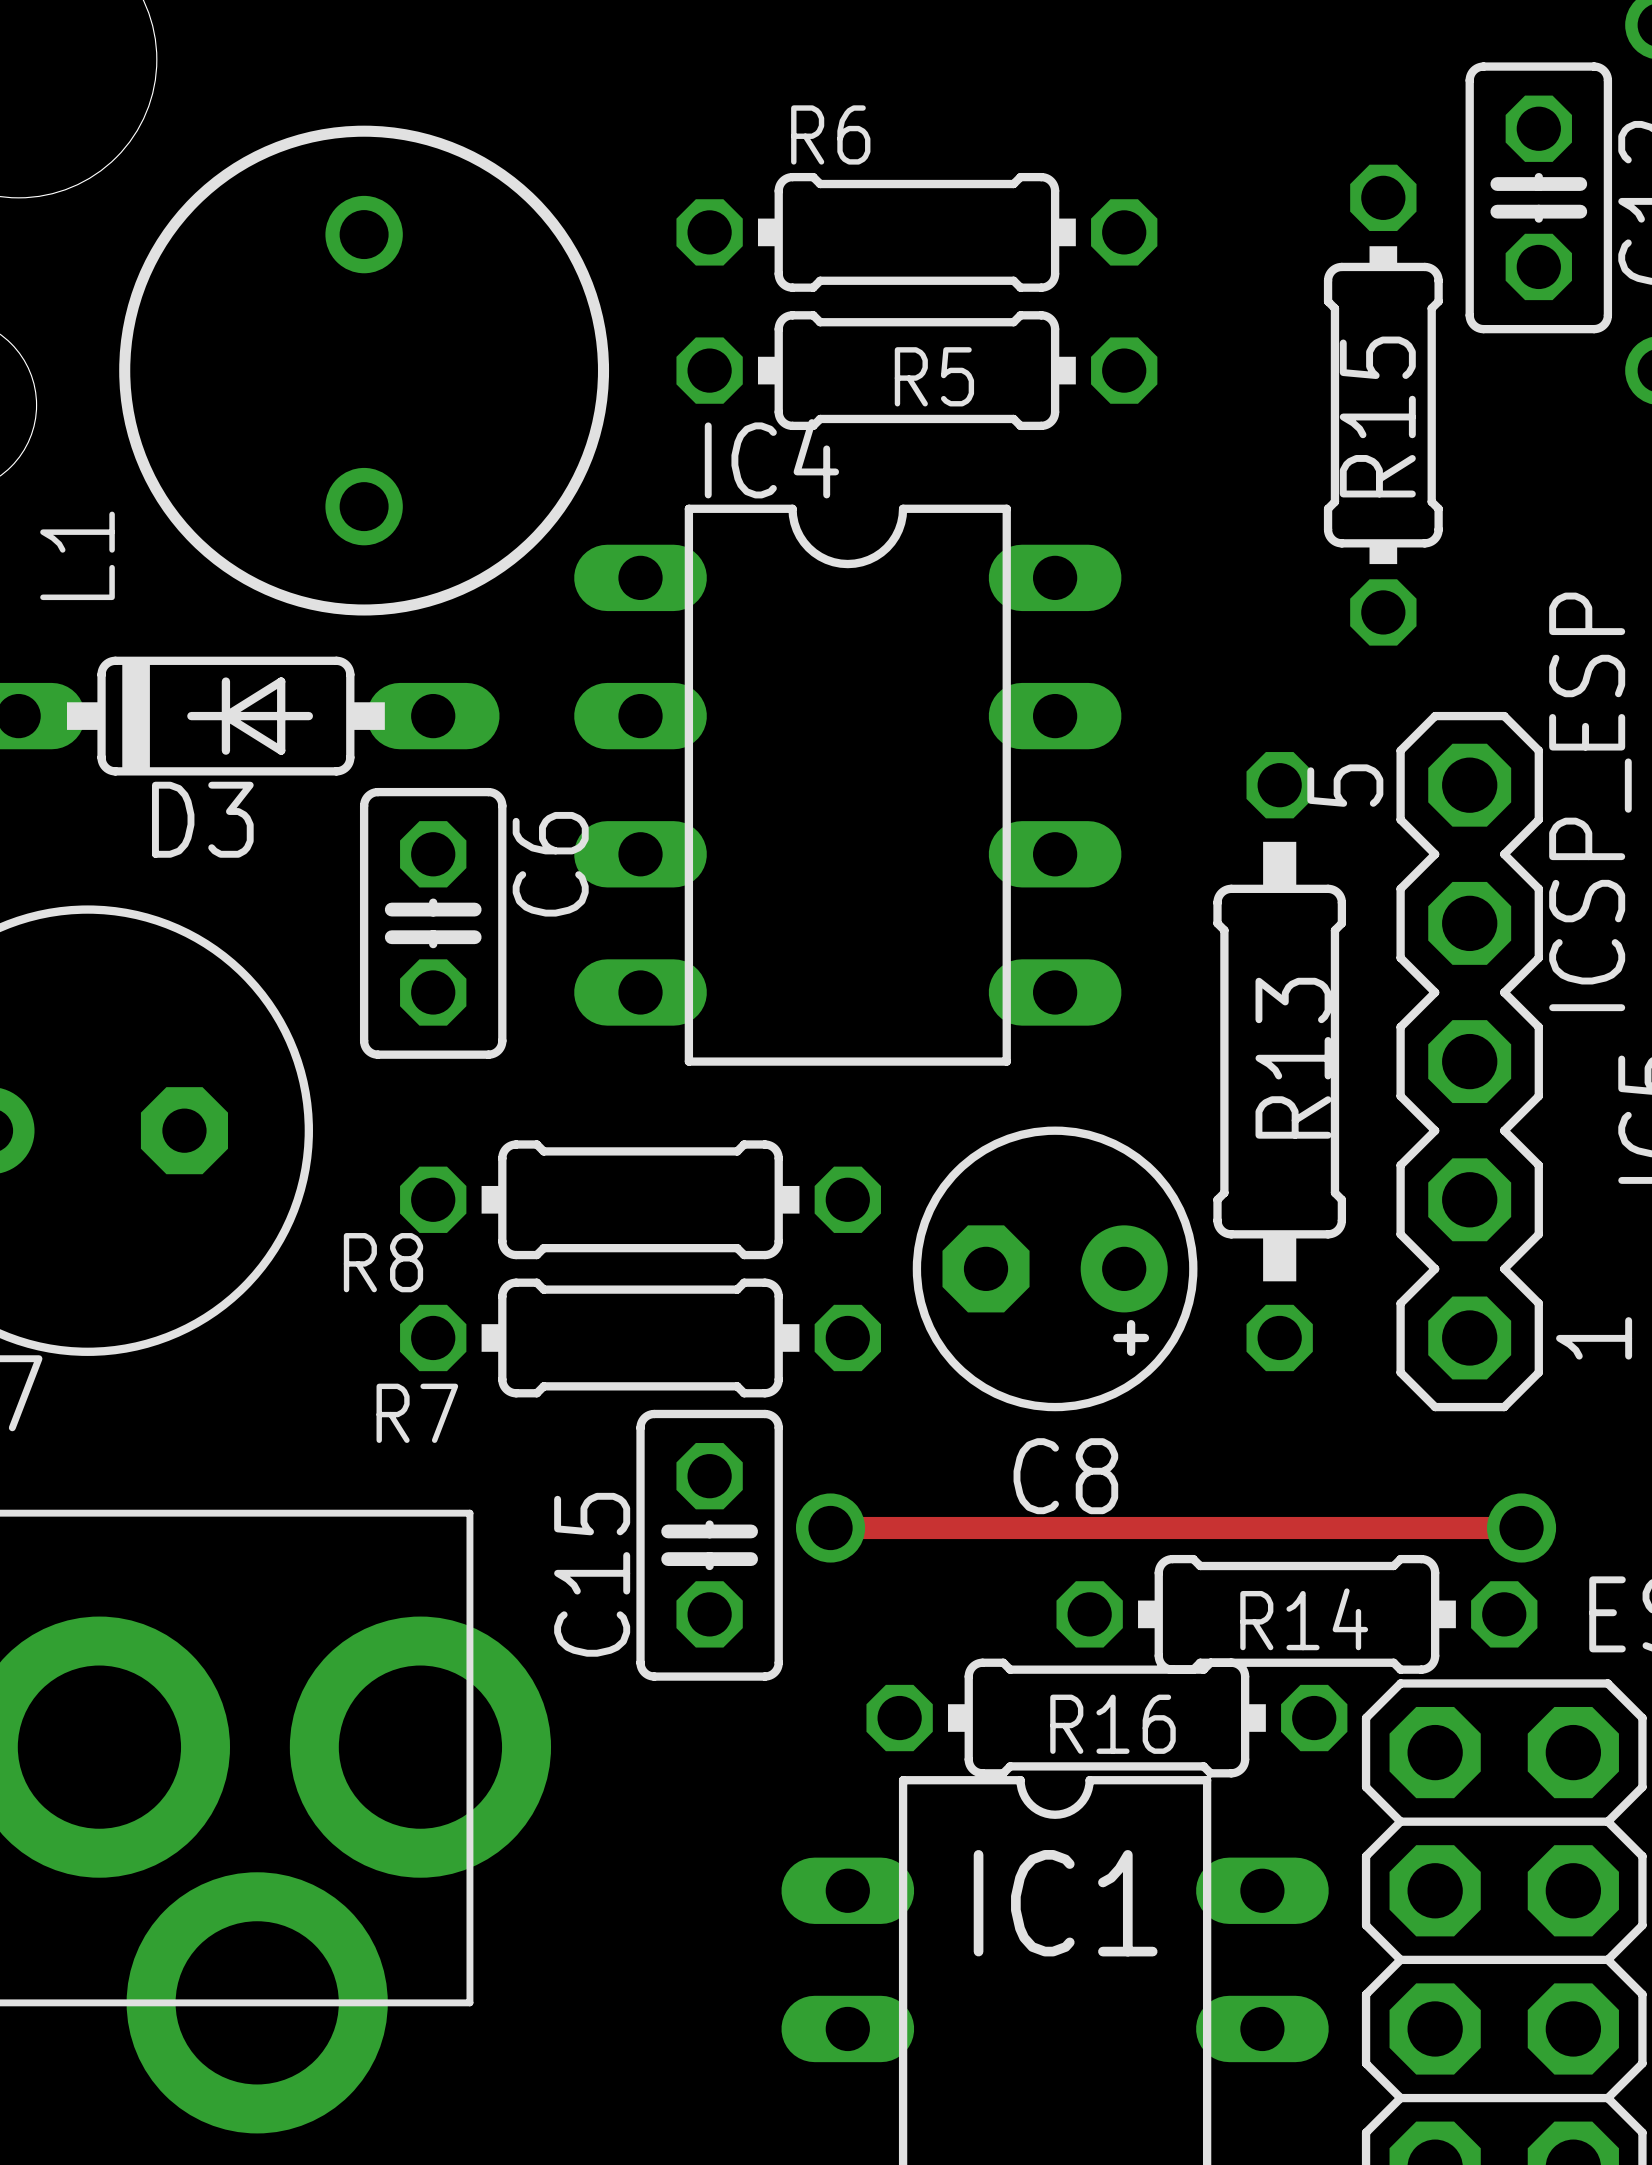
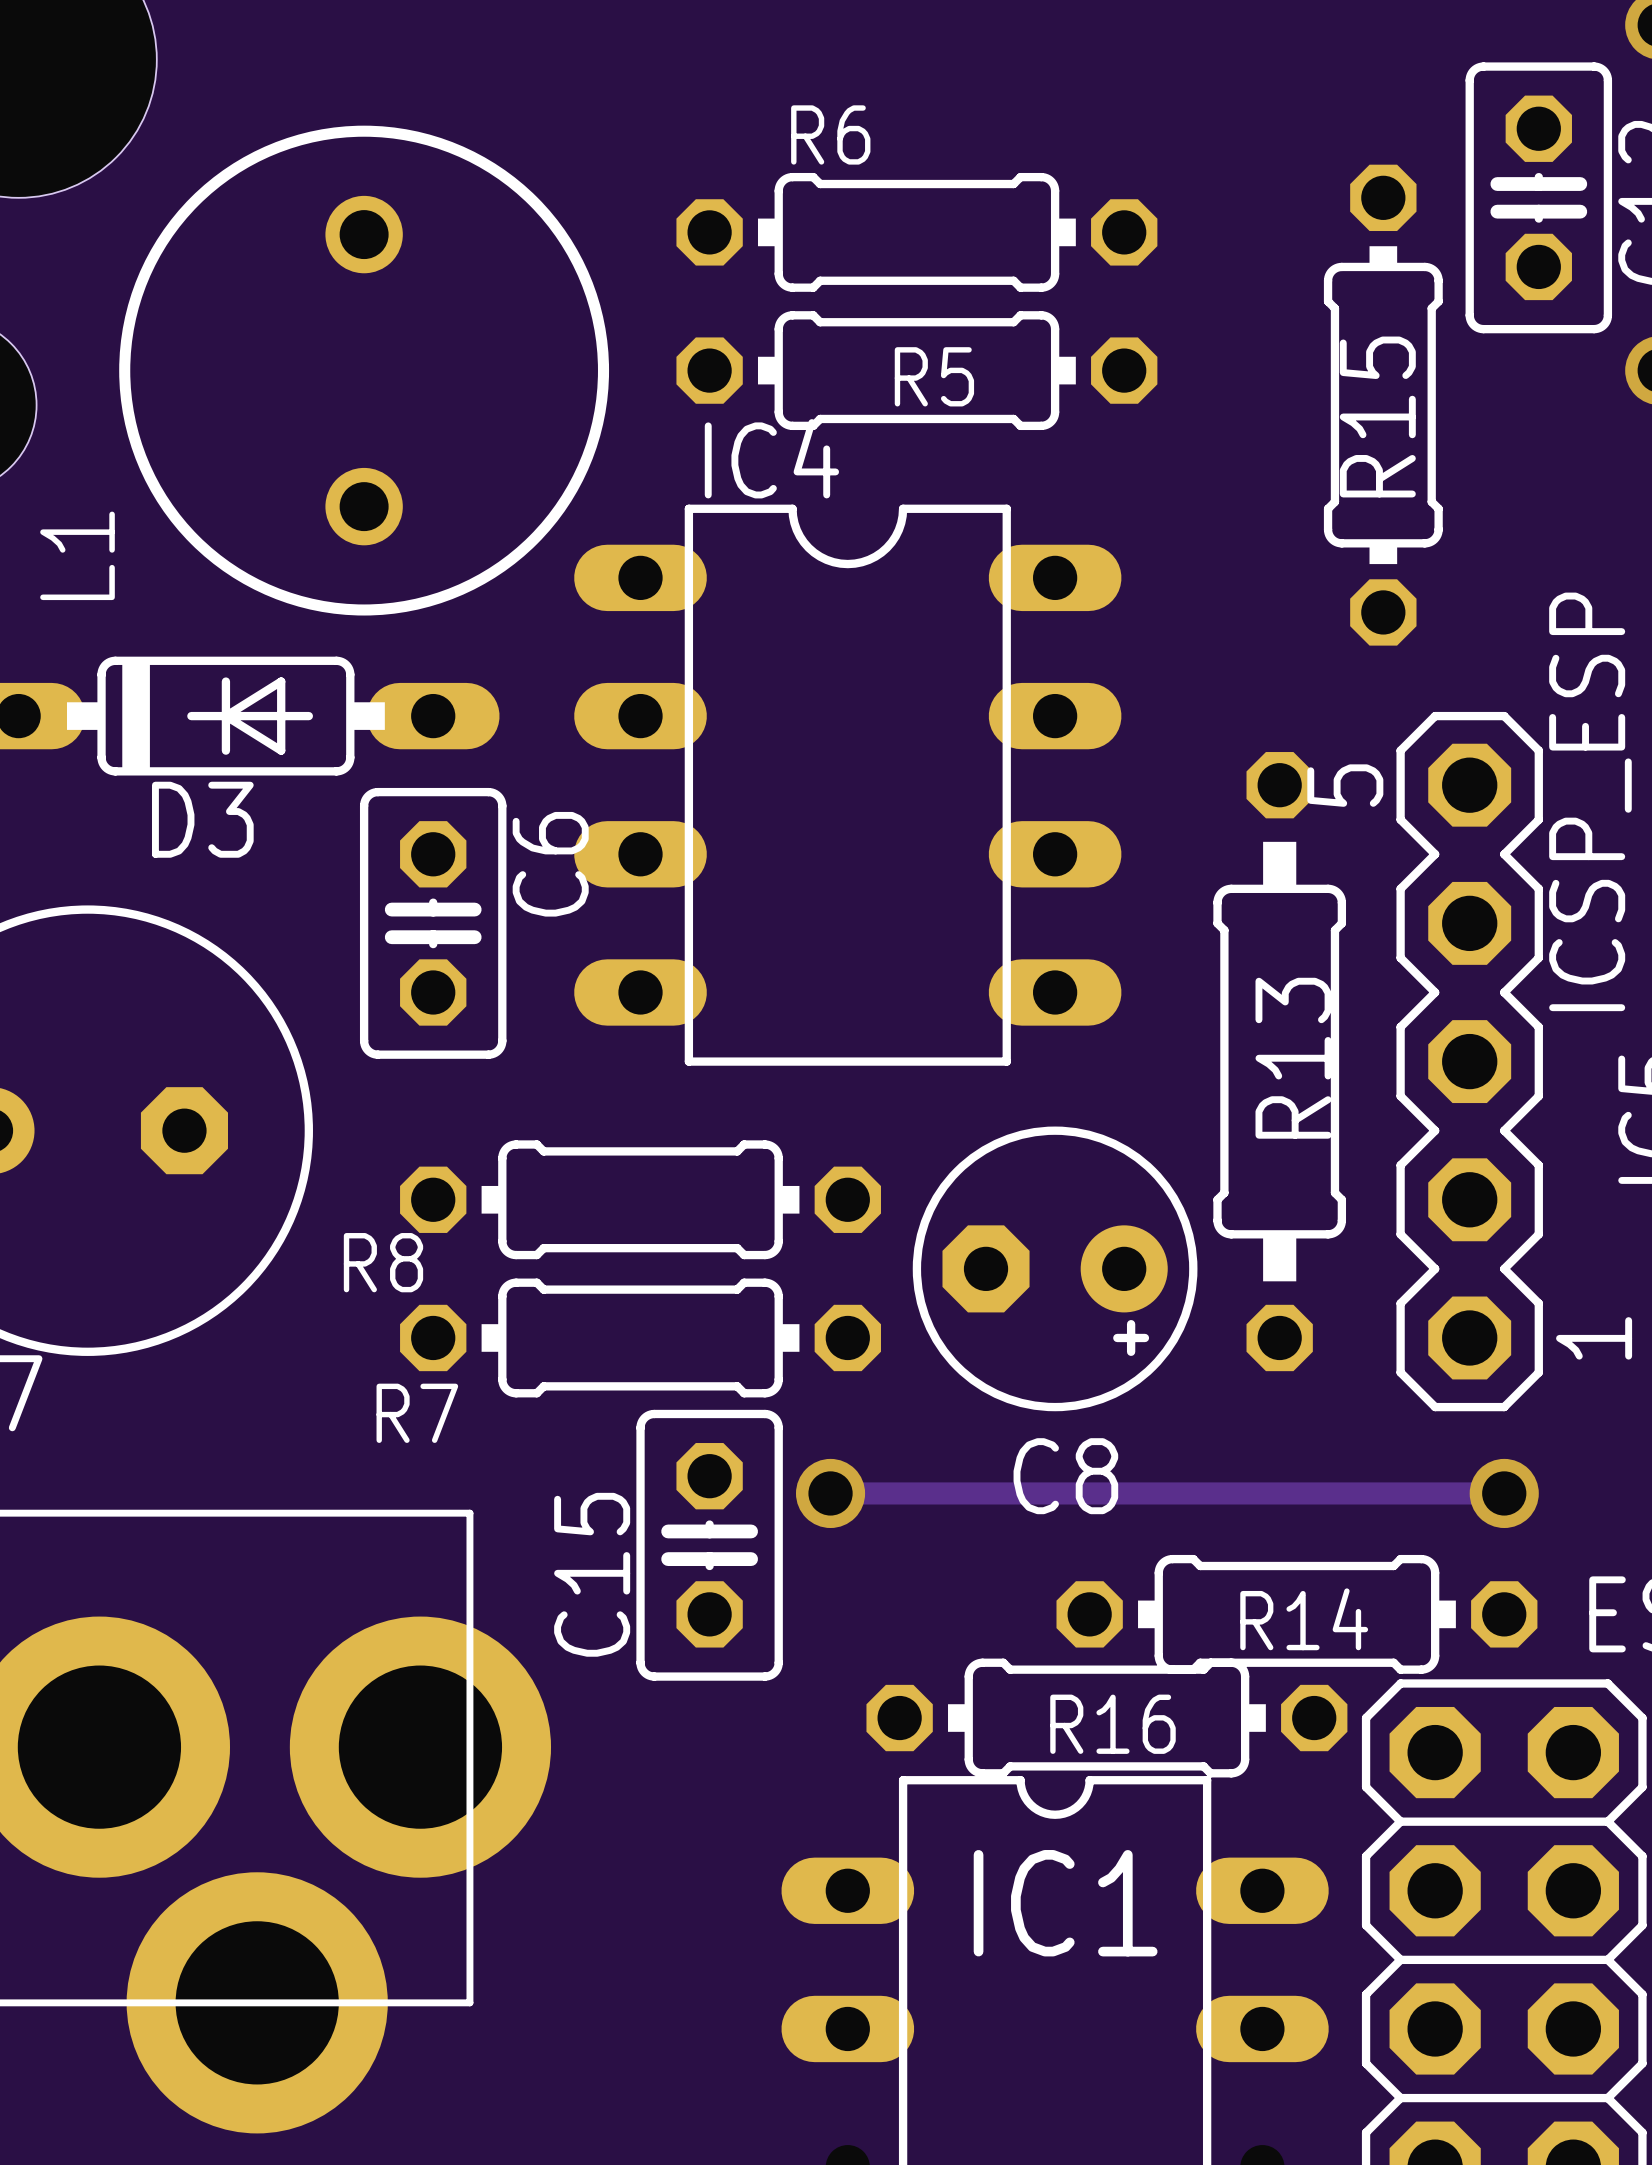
track: none -> (830, 1493) (1504, 1493)
track: (830, 1528) (1521, 1528) -> none
via position: (830, 1528) -> (830, 1493)
via position: (1521, 1528) -> (1504, 1493)

